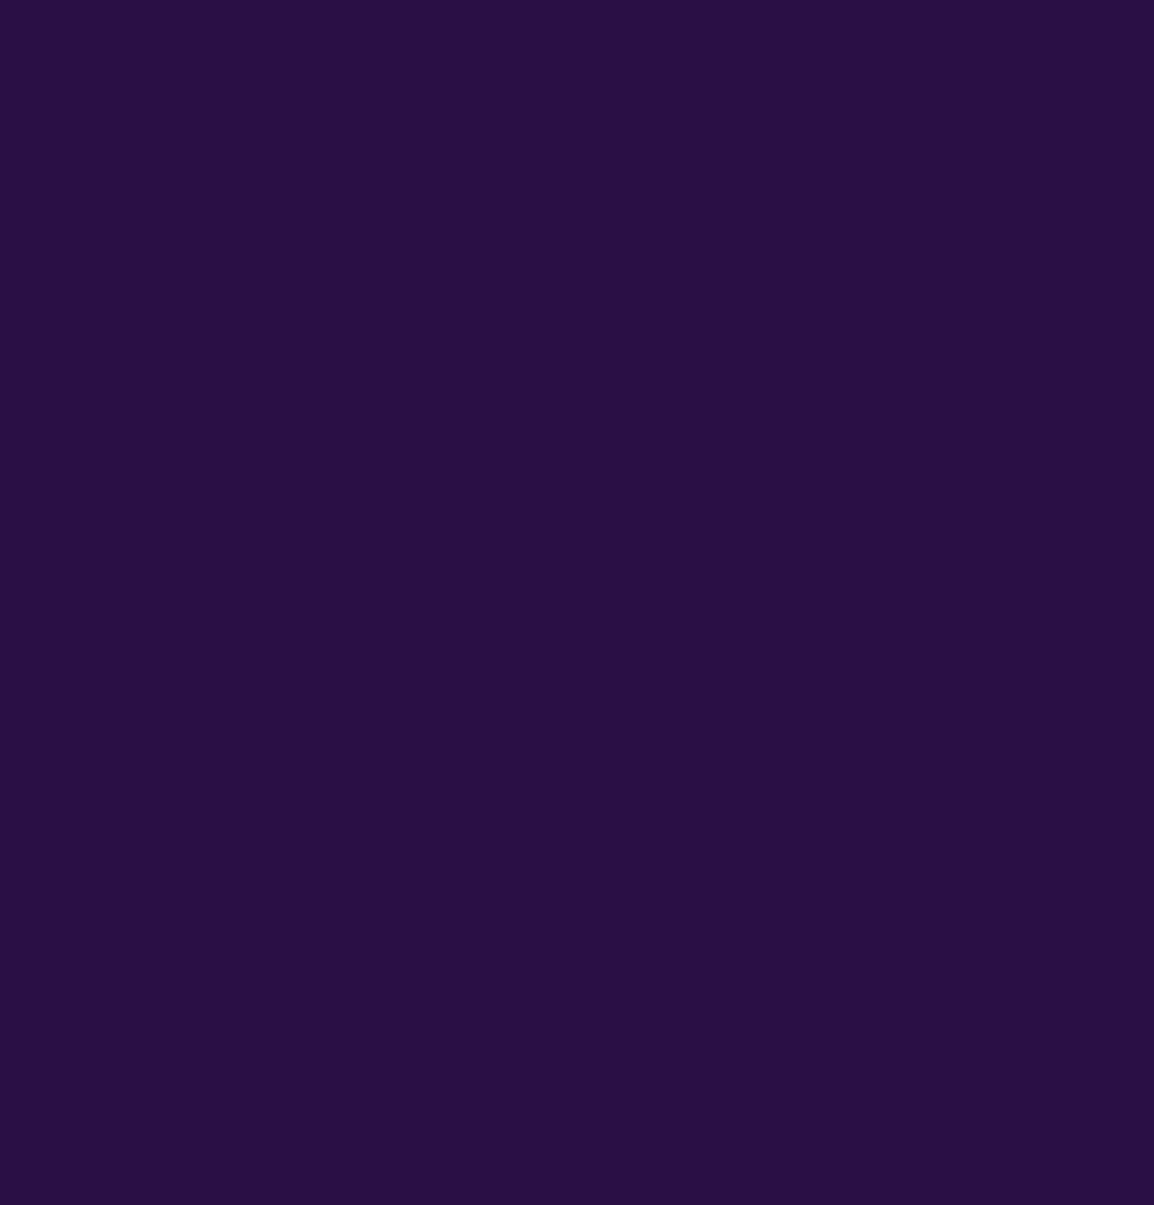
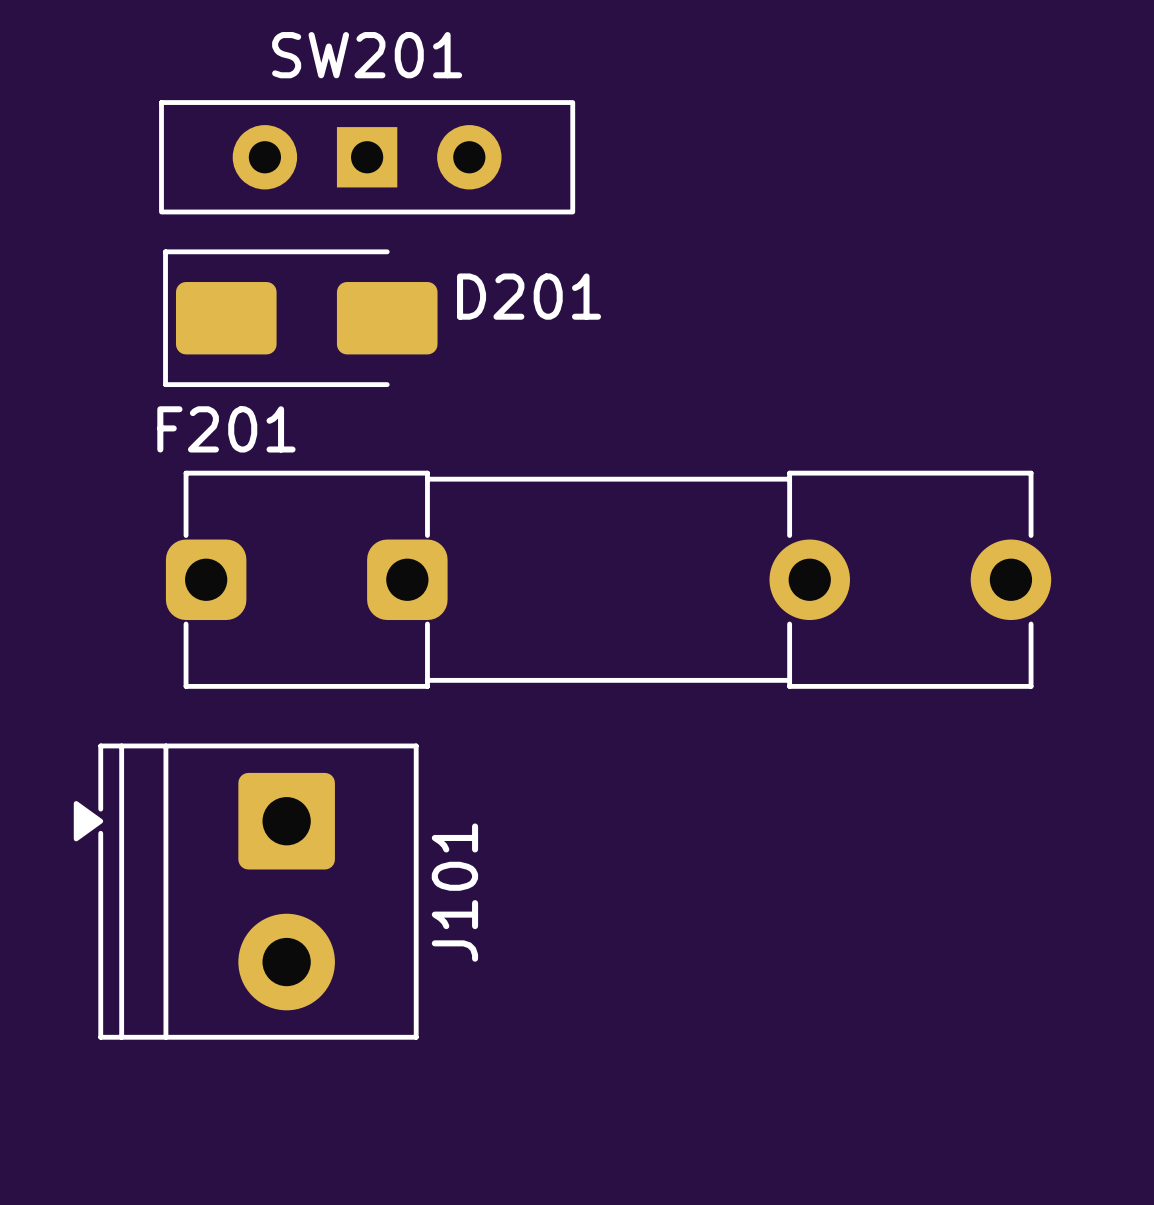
SW201: none -> (367, 157)
D201: none -> (300, 318)
F201: none -> (608, 579)
J101: none -> (246, 891)

